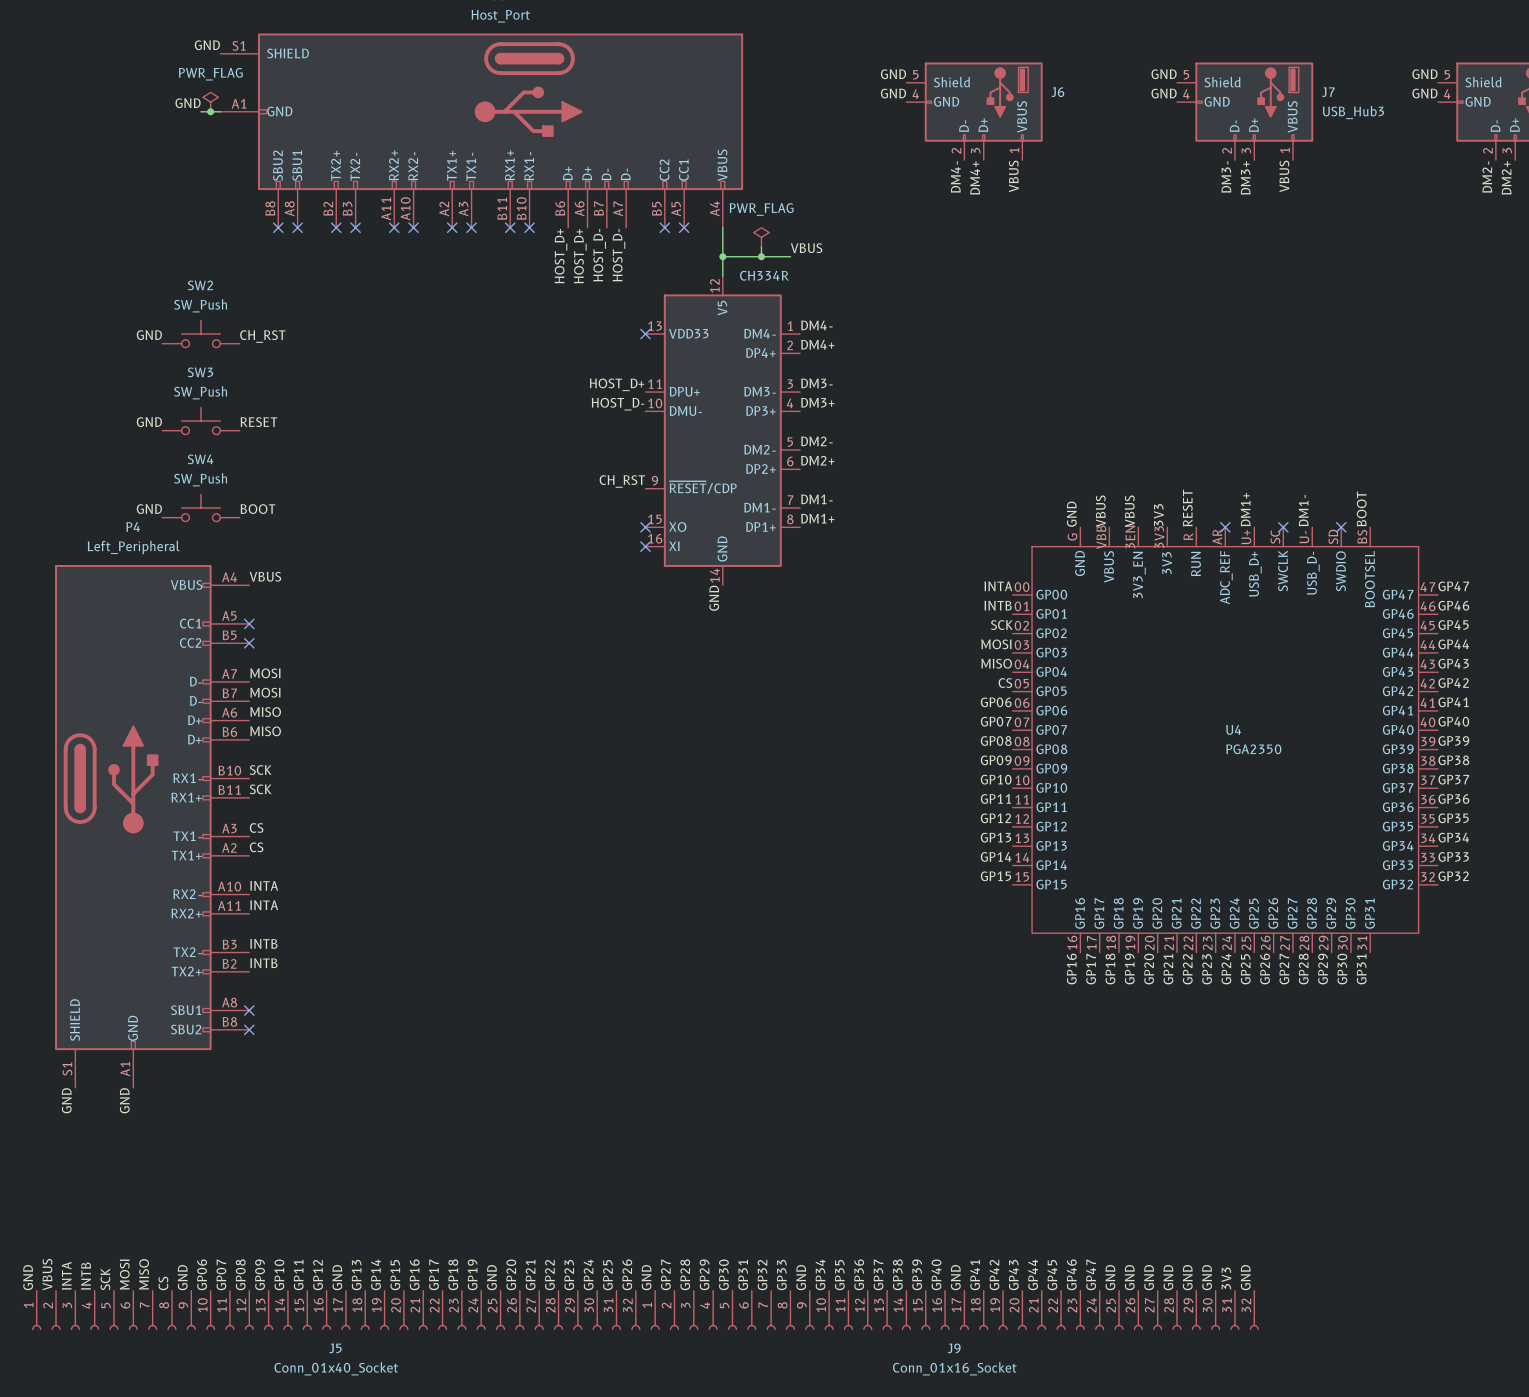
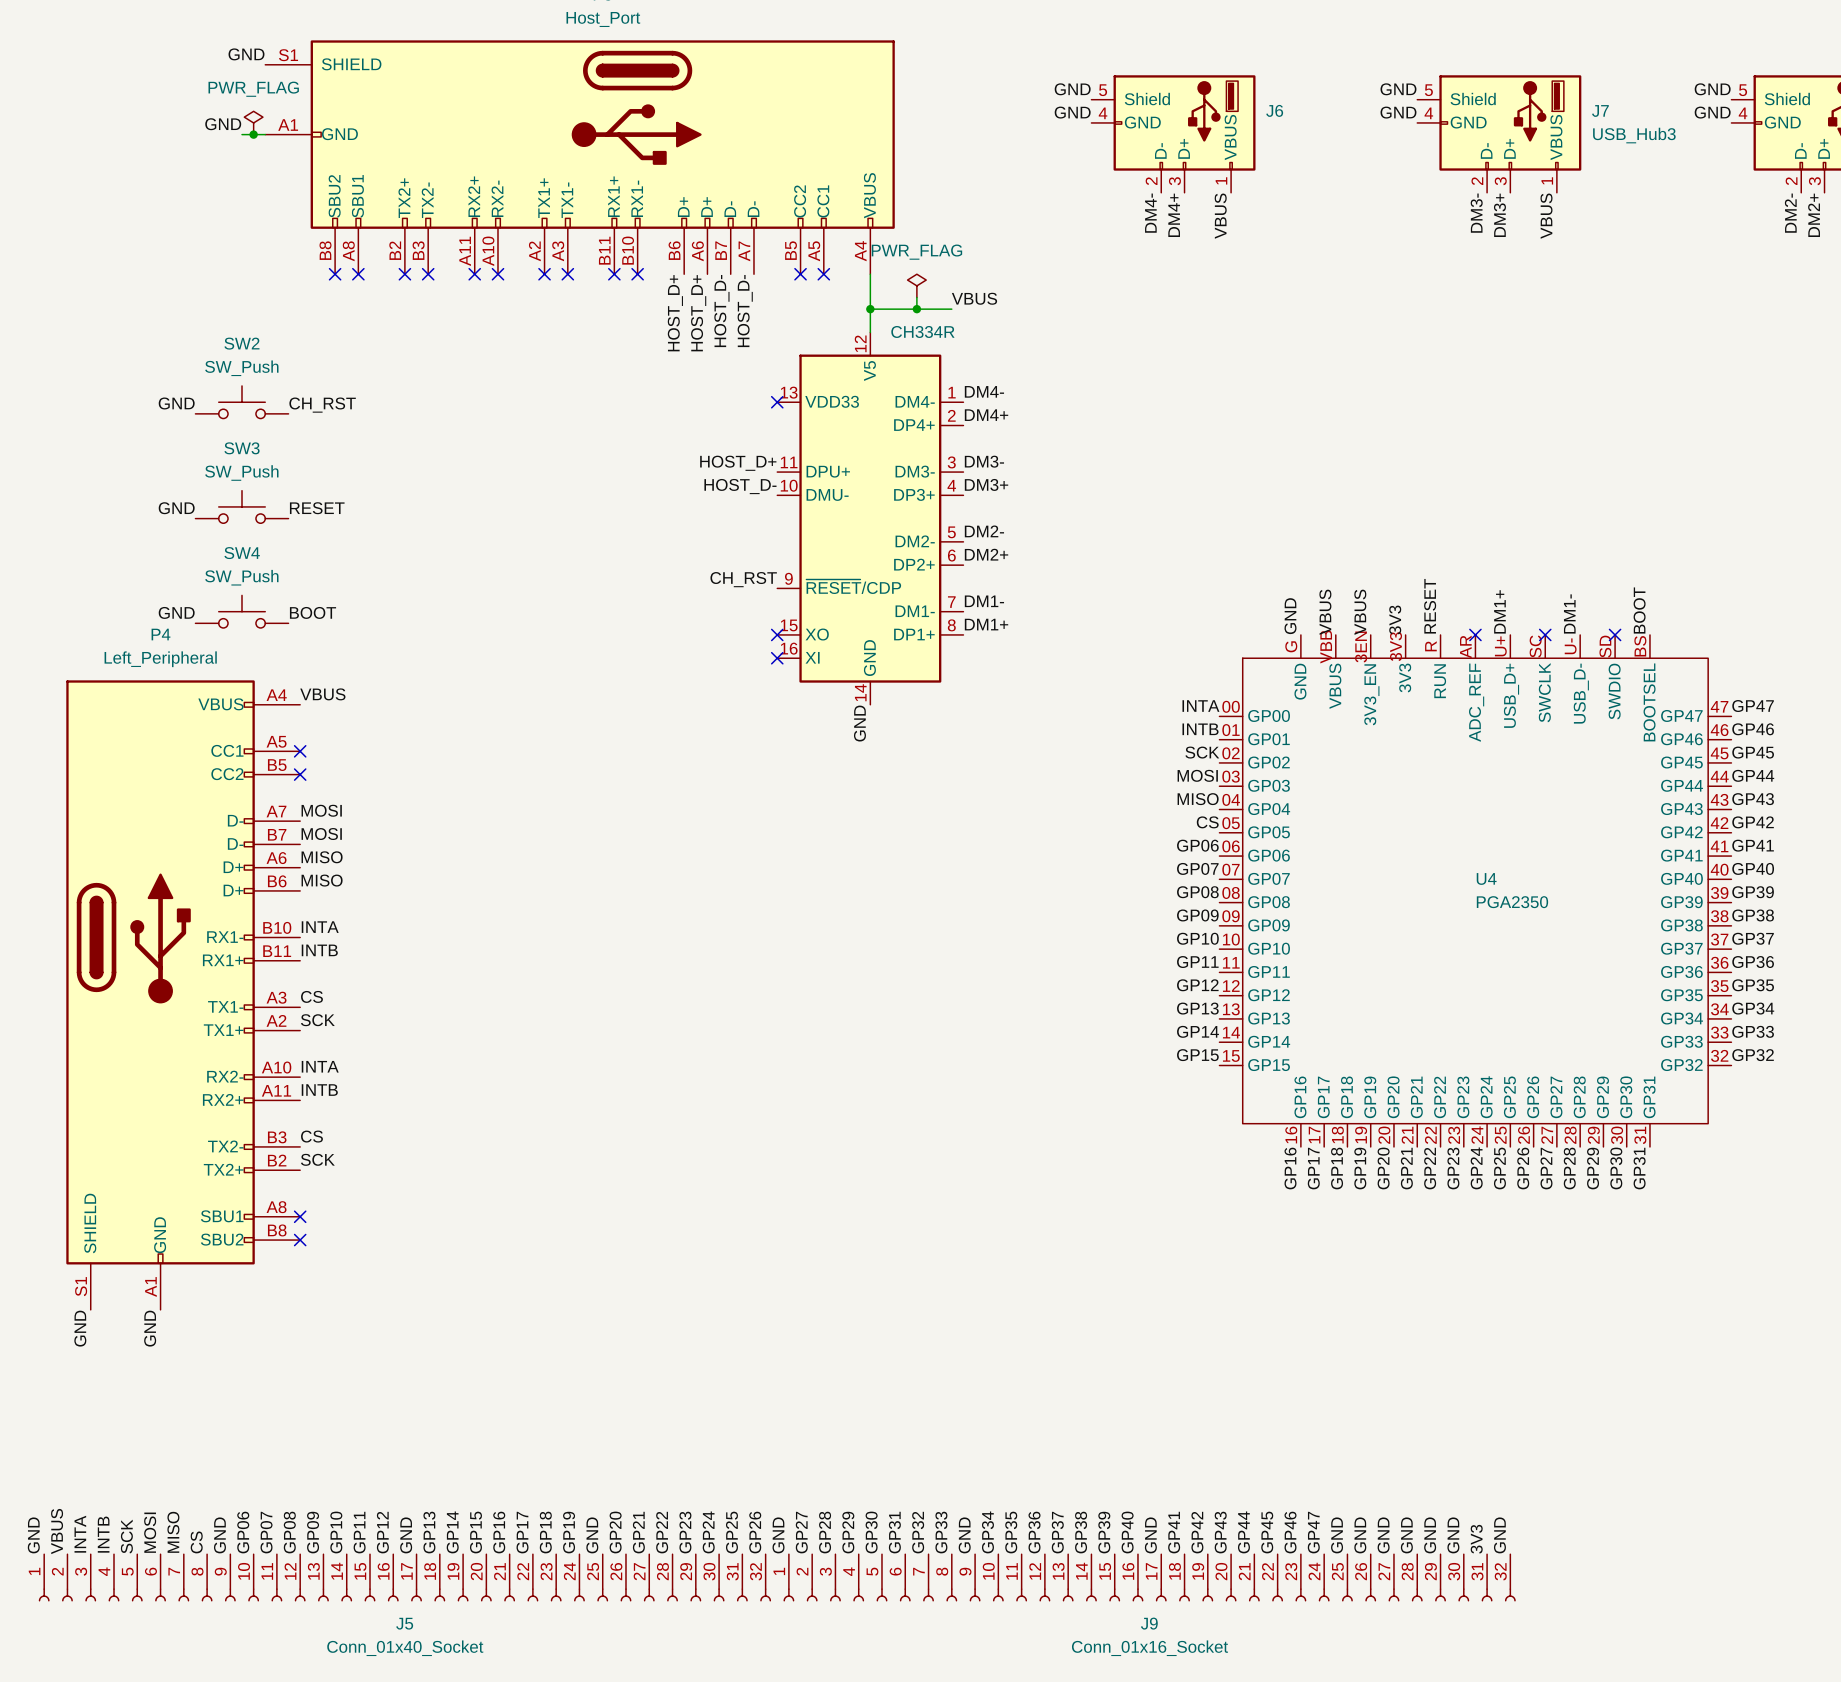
label: SCK (260, 770) -> INTA (320, 927)
label: SCK (260, 789) -> INTB (319, 950)
label: CS (256, 847) -> SCK (317, 1020)
label: INTA (264, 905) -> INTB (319, 1090)
label: INTB (263, 943) -> CS (311, 1136)
label: INTB (263, 963) -> SCK (317, 1159)

